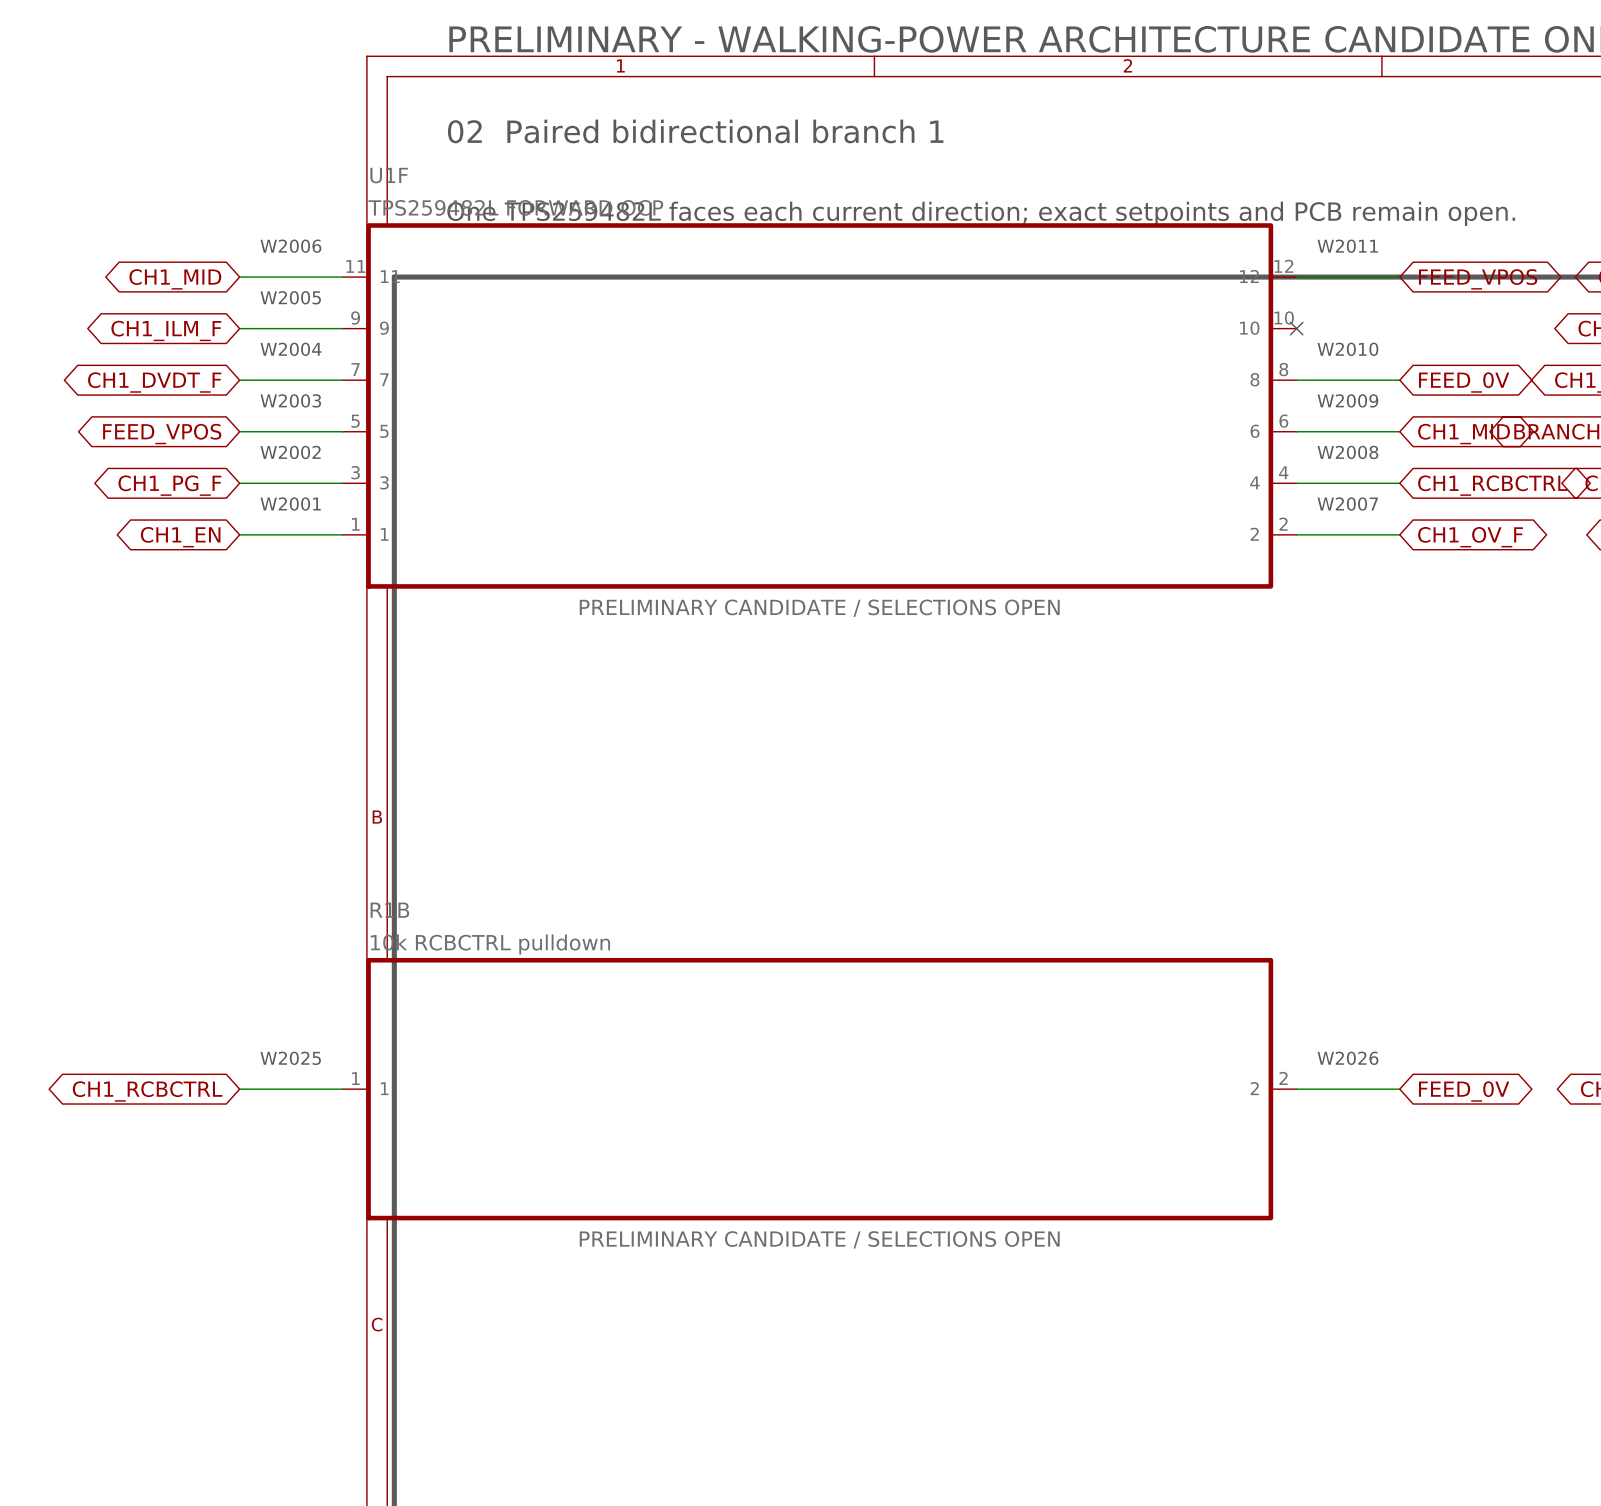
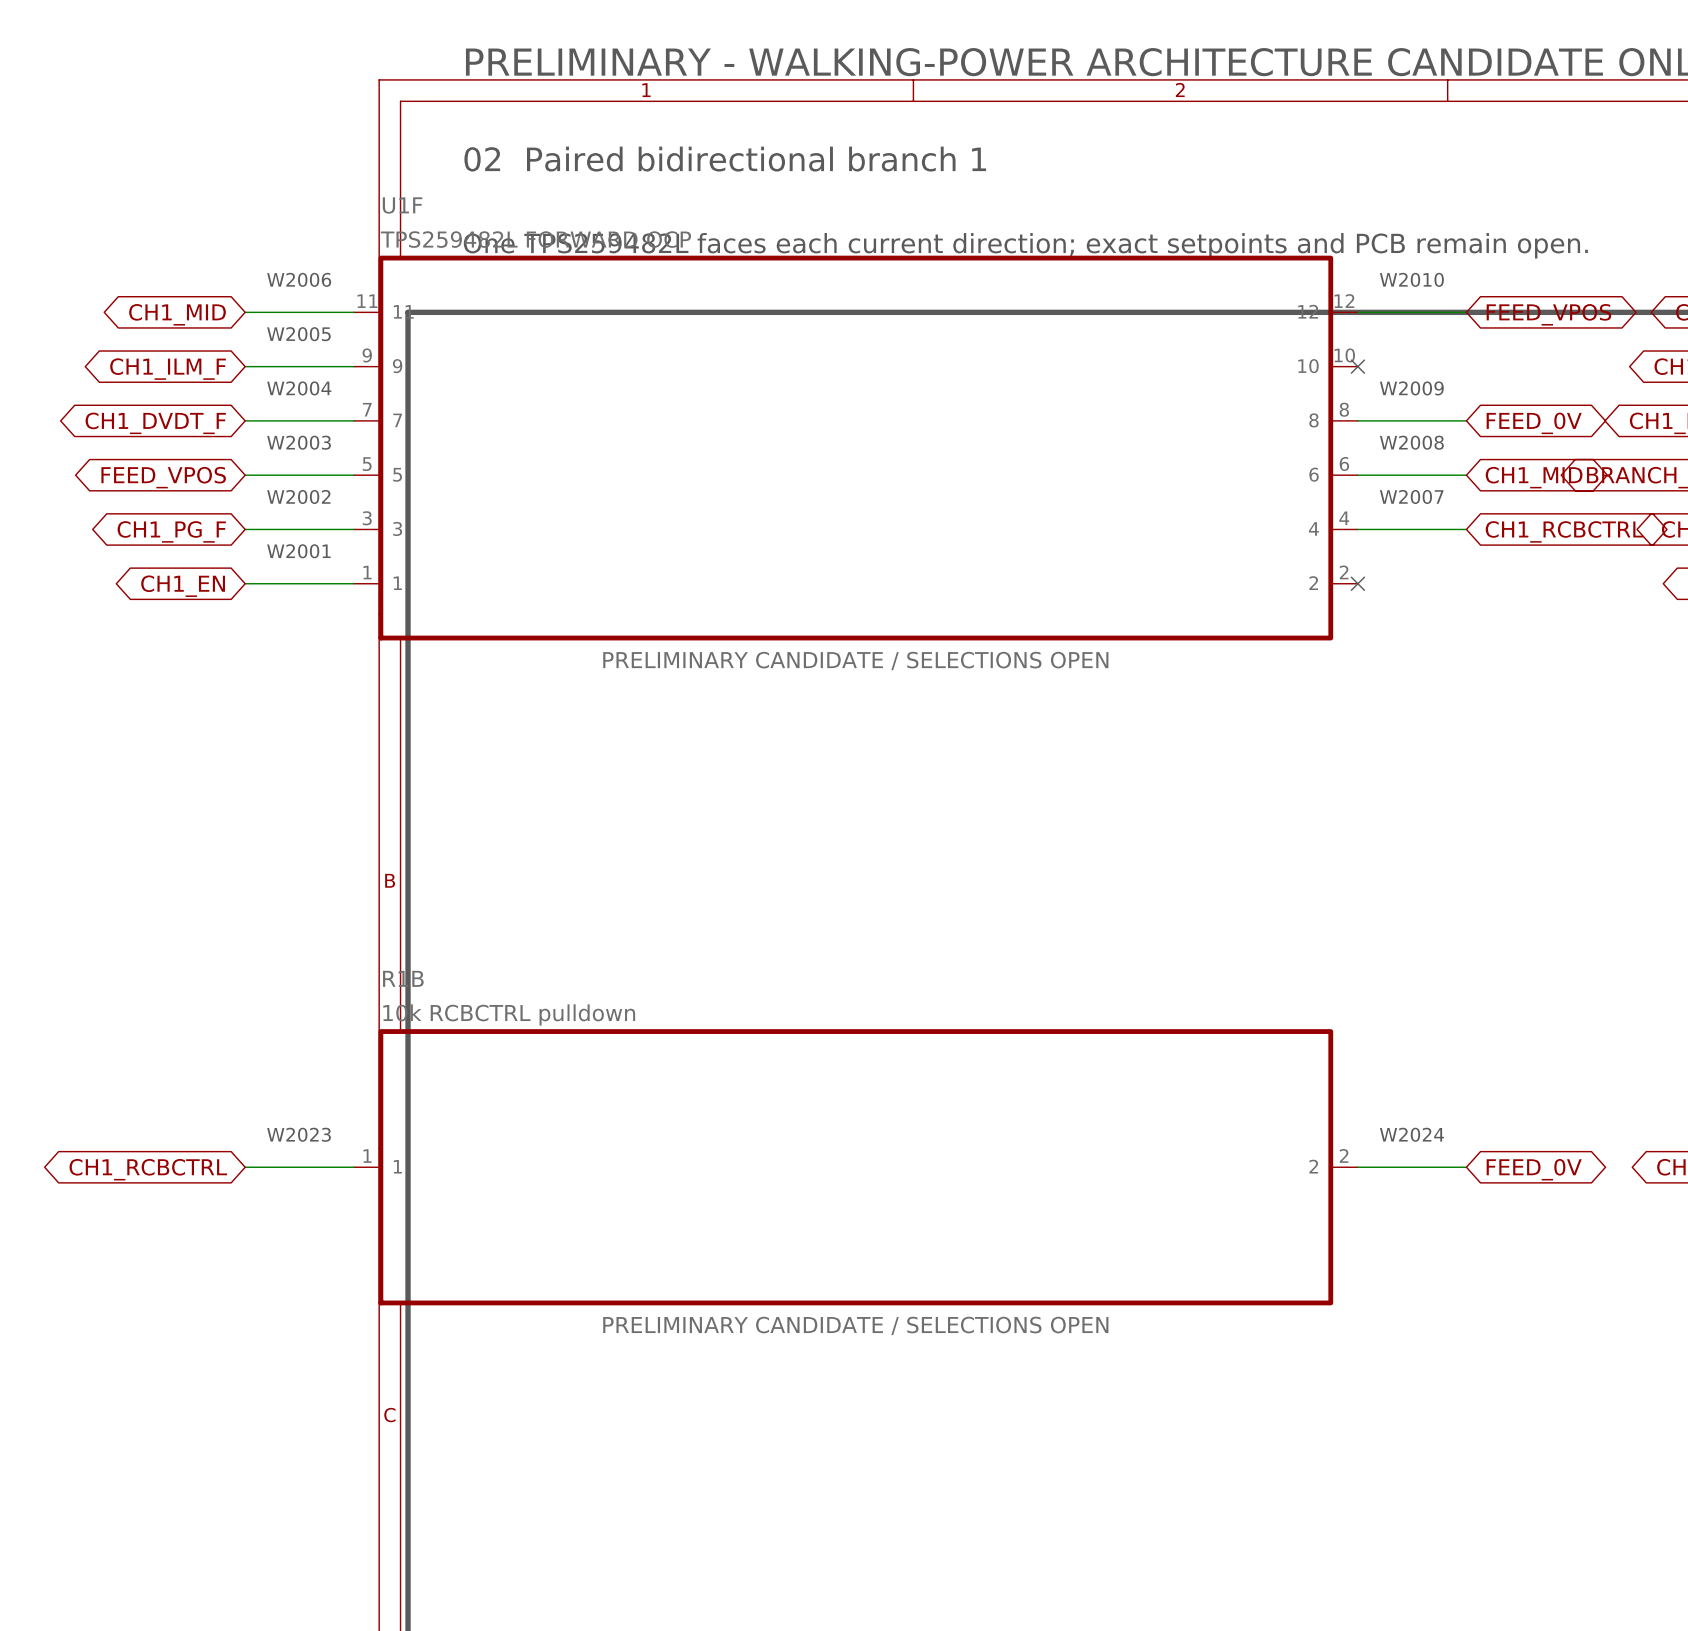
text: W2011 (1347, 246) -> W2010 (1411, 279)
text: W2010 (1347, 349) -> W2009 (1411, 388)
text: W2009 (1347, 400) -> W2008 (1411, 442)
text: W2008 (1347, 452) -> W2007 (1411, 496)
text: W2007 (1347, 504) -> none
wire: (1296, 534) (1399, 534) -> none
no-connect mark: none -> (1357, 583)
global label: CH1_OV_F (1470, 537) -> none
text: W2025 (290, 1058) -> W2023 (299, 1134)
text: W2026 (1347, 1058) -> W2024 (1411, 1134)

